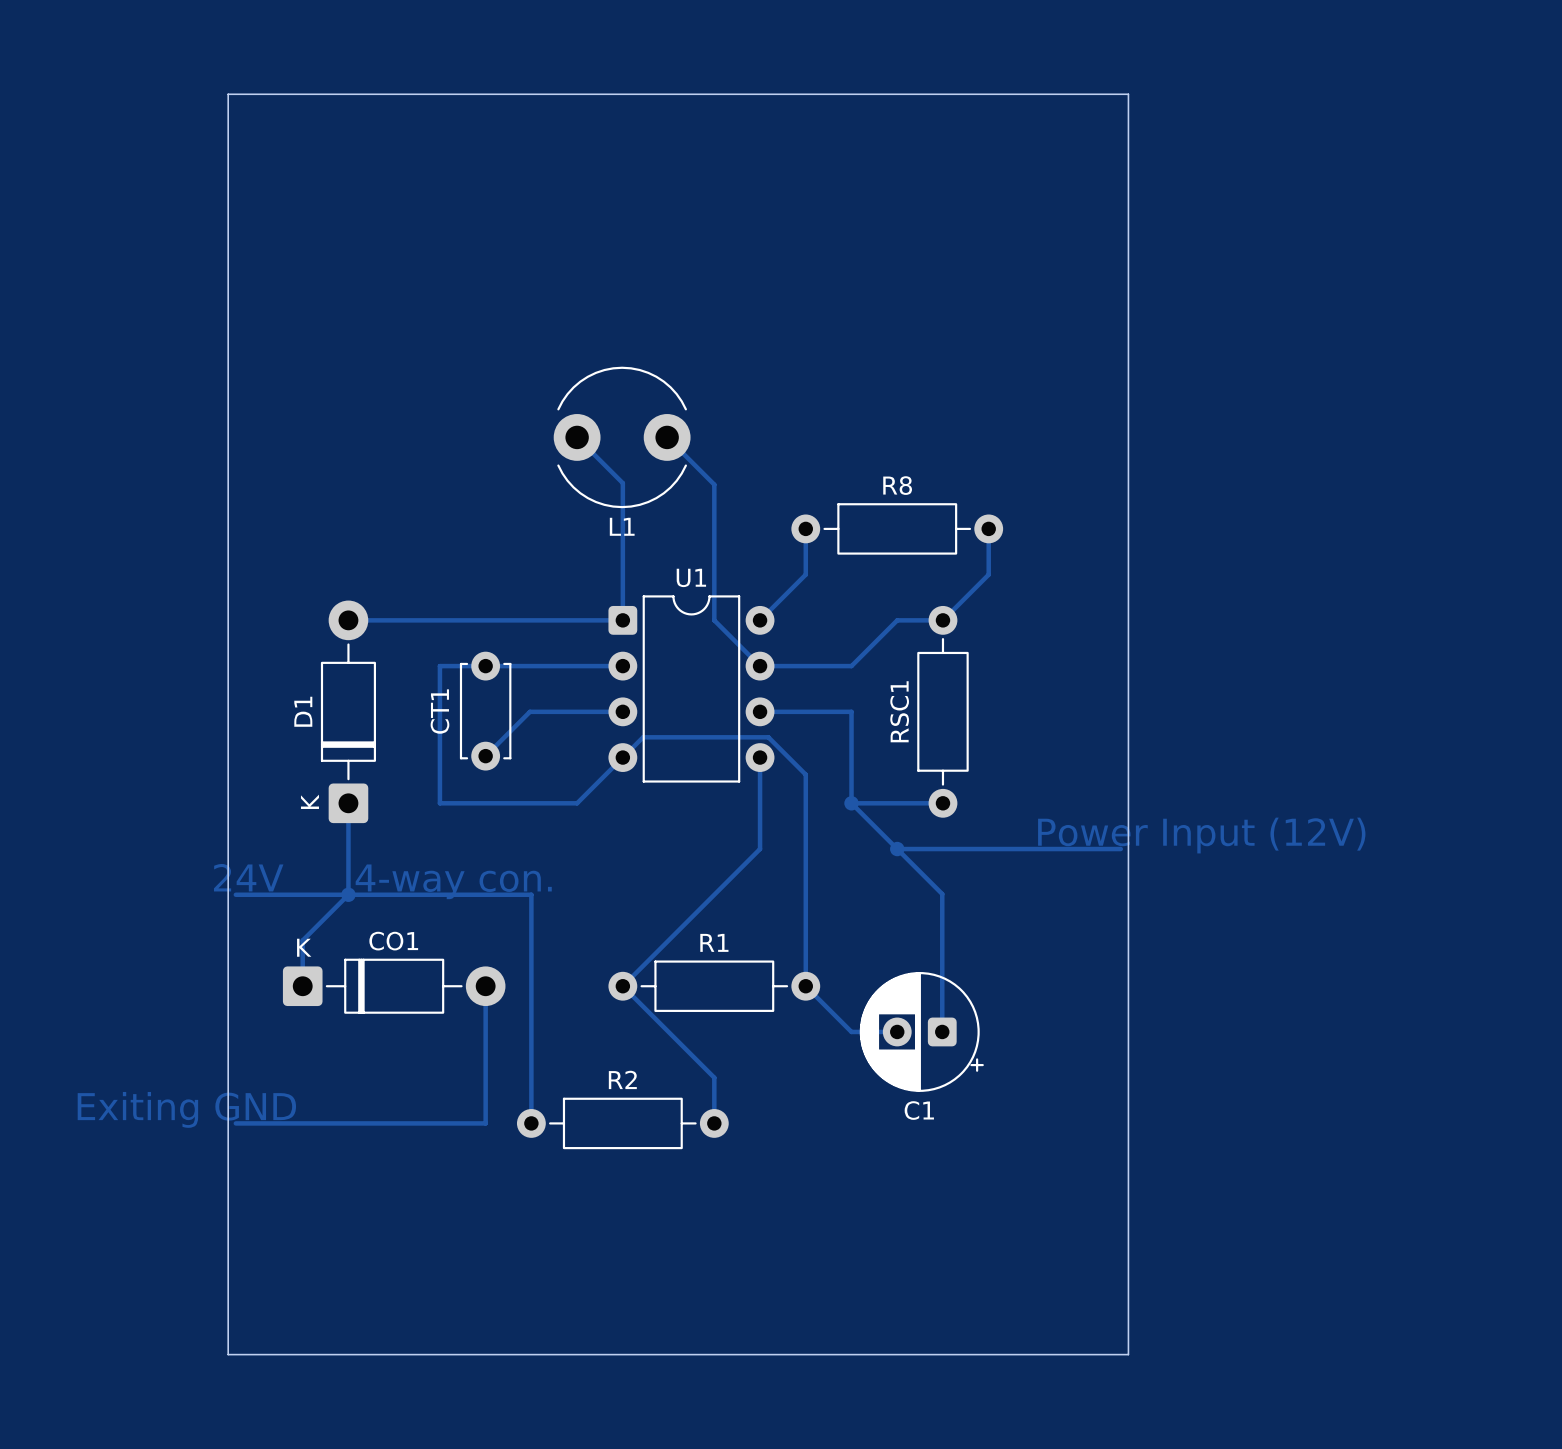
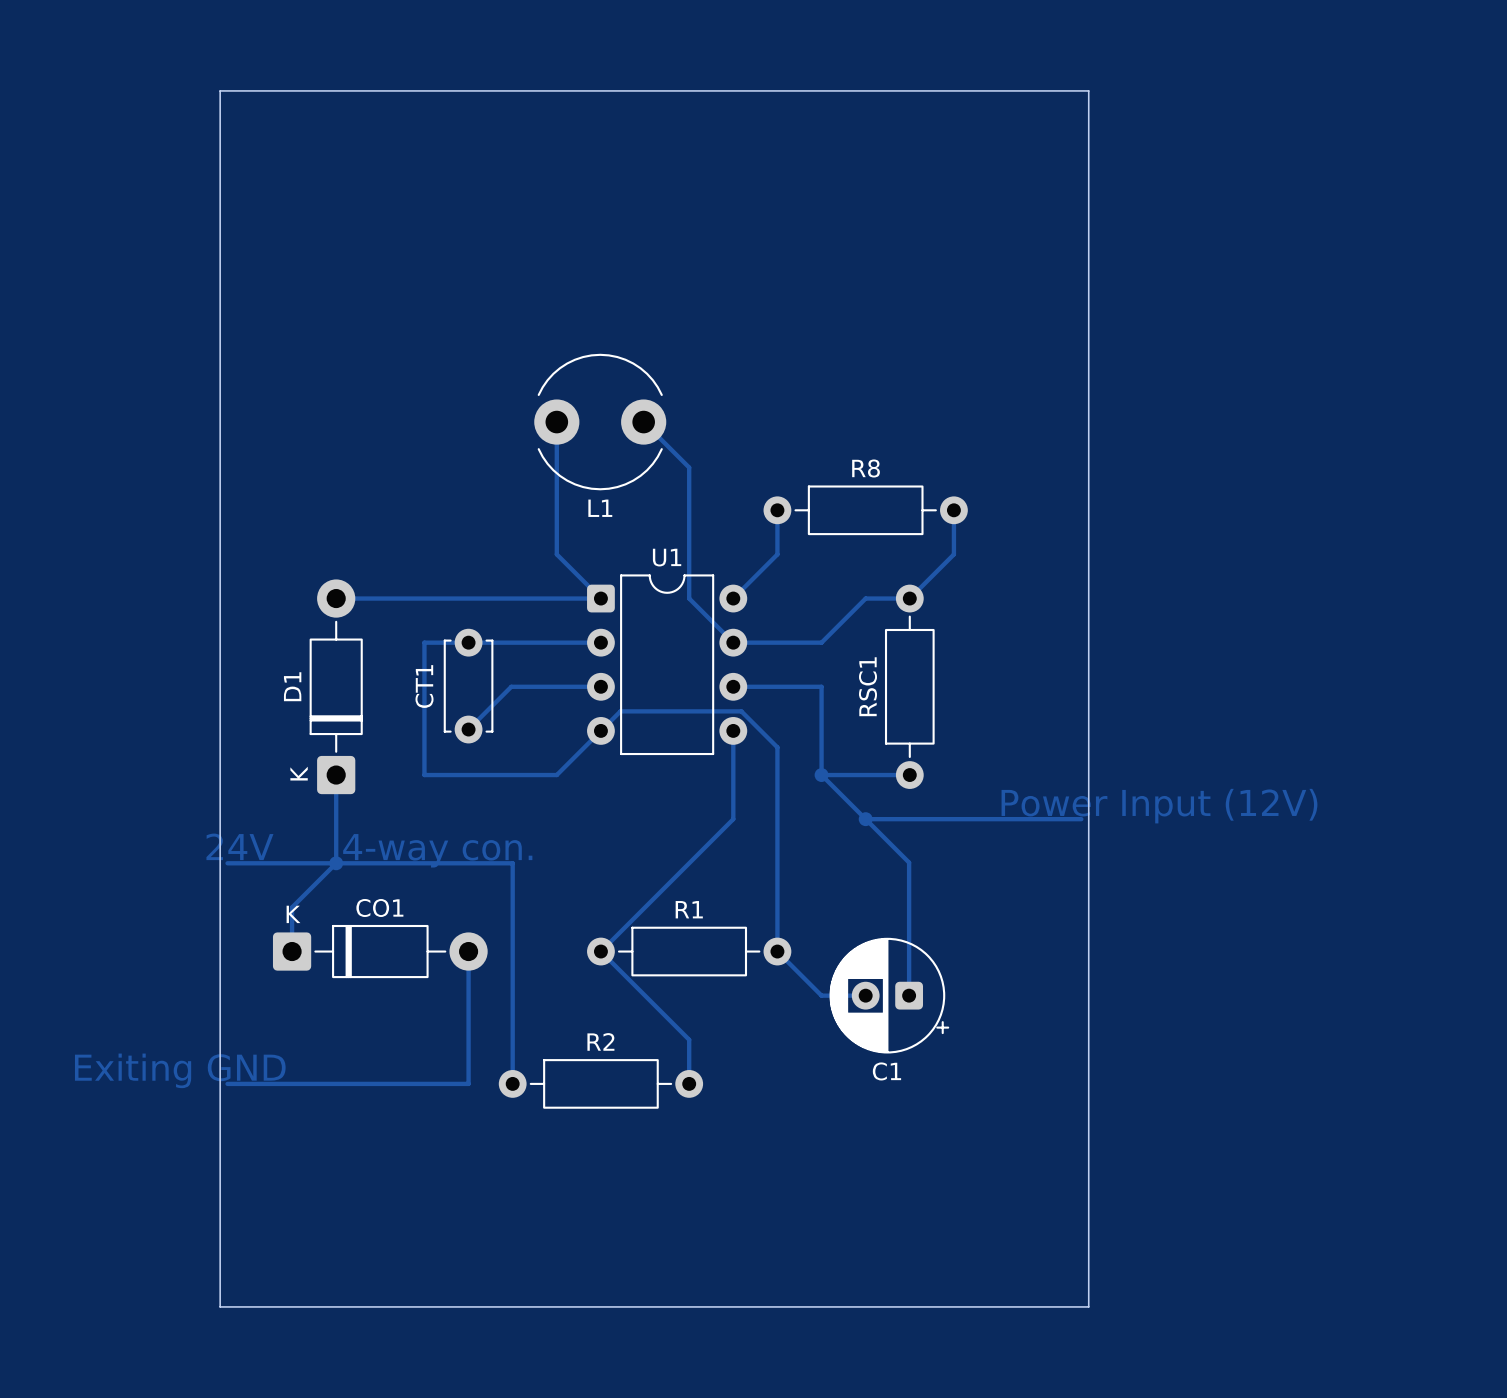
track: (577, 437) (622, 483) (622, 620) -> (556, 422) (556, 554) (600, 598)

